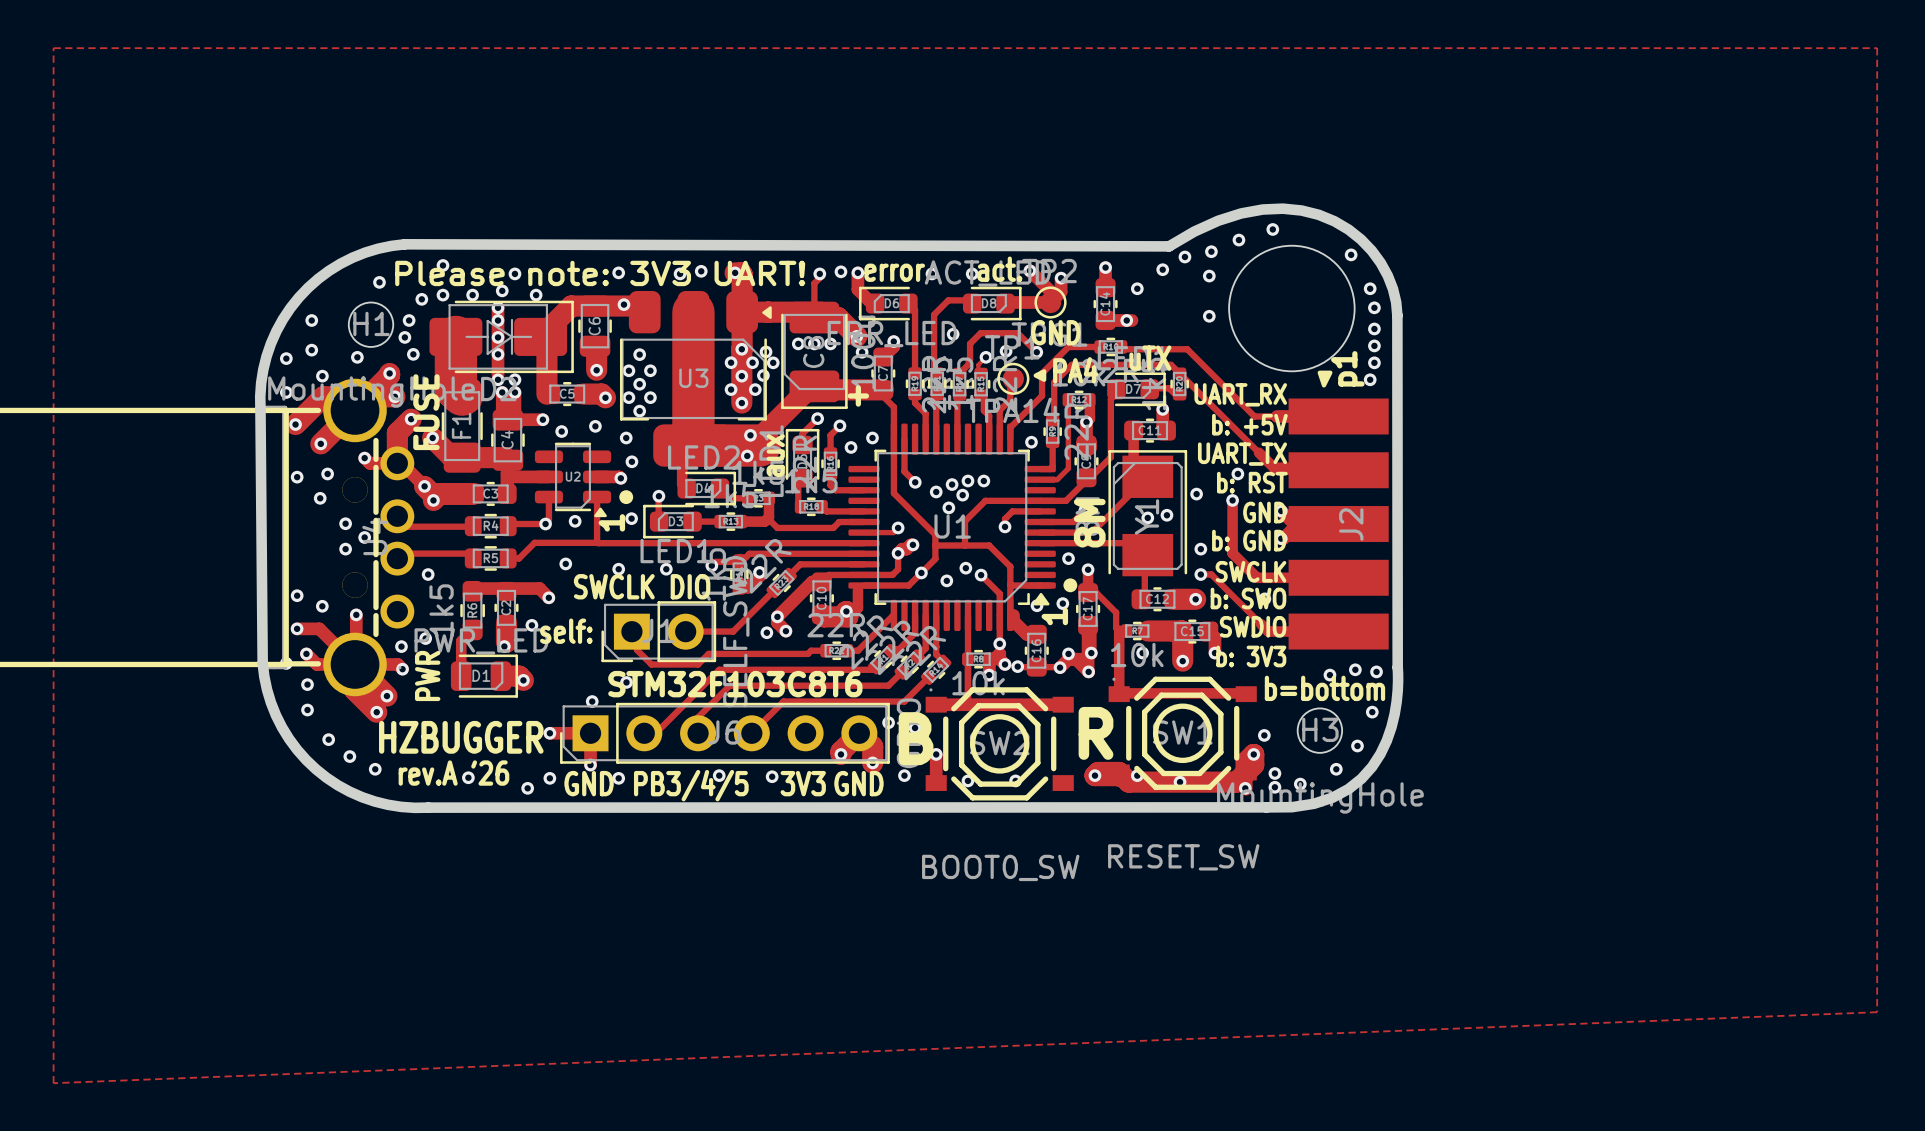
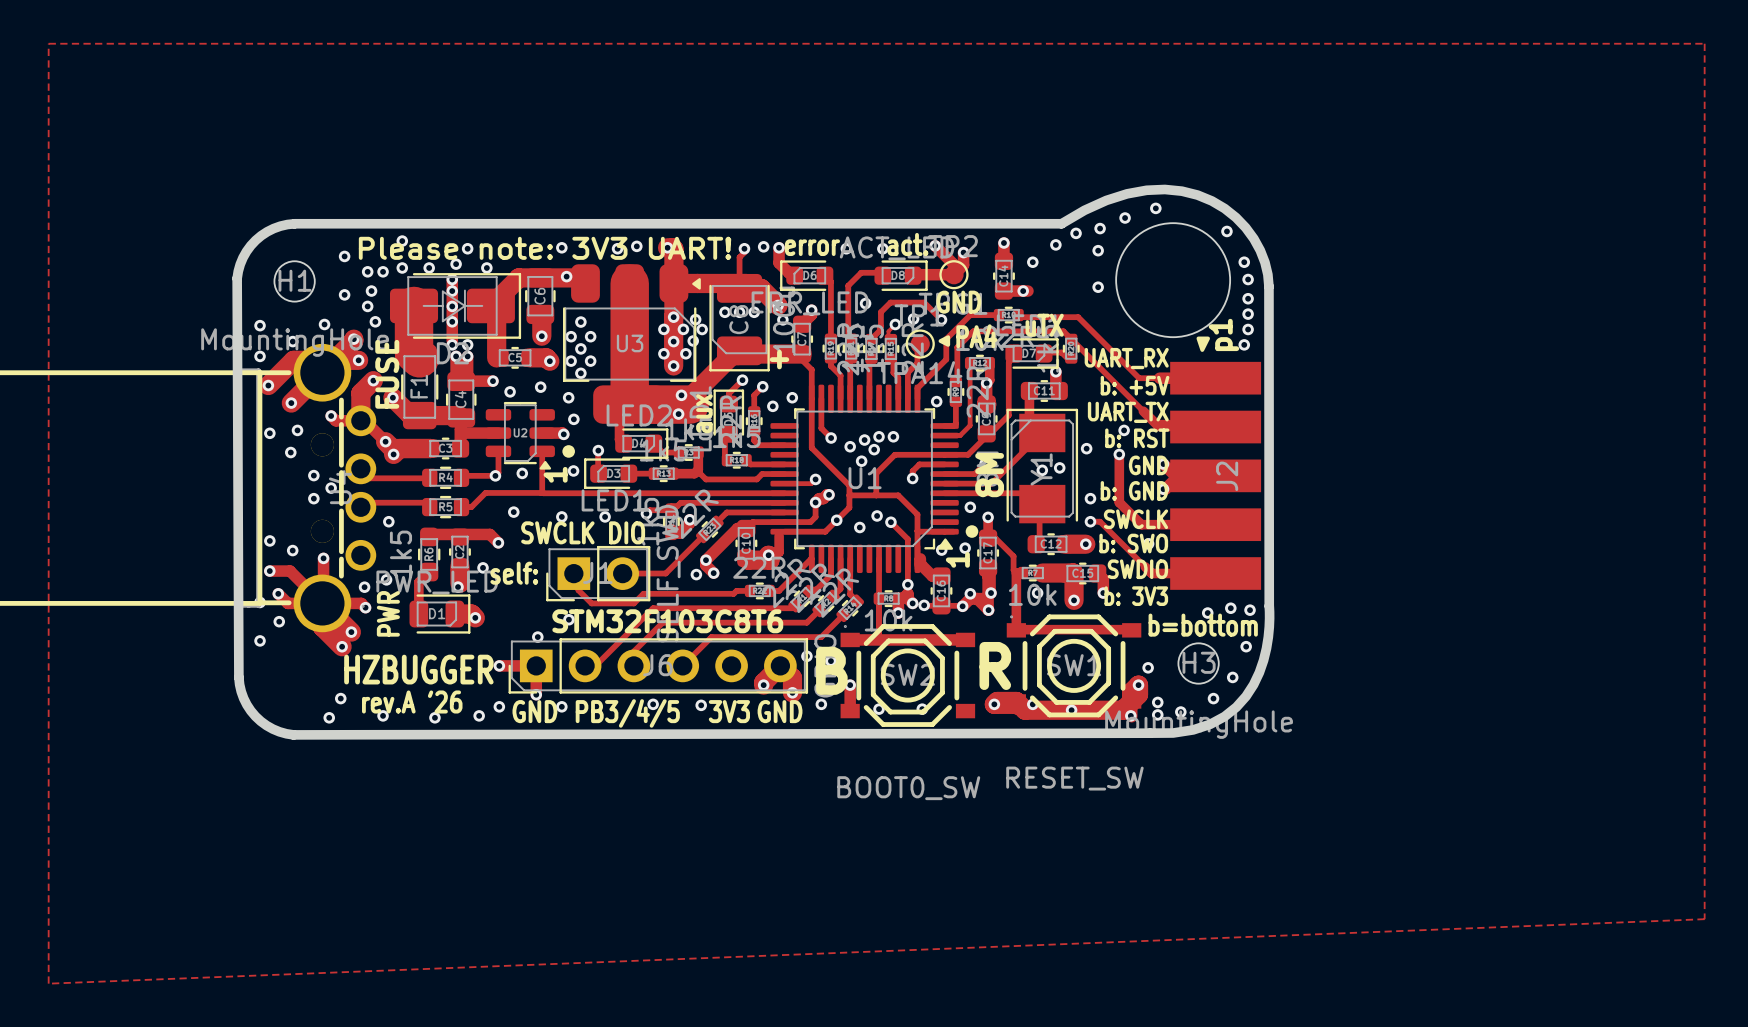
board edge: (1169, 246) (404, 244) (378, 248) (352, 257) (318, 278) (290, 308) (270, 343) (263, 369) (260, 396) (264, 676) (276, 715) (289, 738) (306, 759) (326, 777) (349, 791) (374, 801) (401, 806) (1266, 807) -> (1061, 223) (294, 223) (280, 226) (267, 231) (255, 240) (246, 251) (240, 264) (237, 278) (239, 684) (246, 704) (260, 721) (279, 731) (293, 734) (1150, 733)
via: none -> (367, 271)
via: (311, 320) -> none
H1 position: (371, 324) -> (294, 281)
via: none -> (344, 294)
via: (311, 350) -> none
via position: (307, 710) -> (260, 640)
via: (328, 739) -> none
via: (349, 756) -> none
via position: (468, 777) -> (434, 717)
via: none -> (383, 715)
via: none -> (329, 717)

